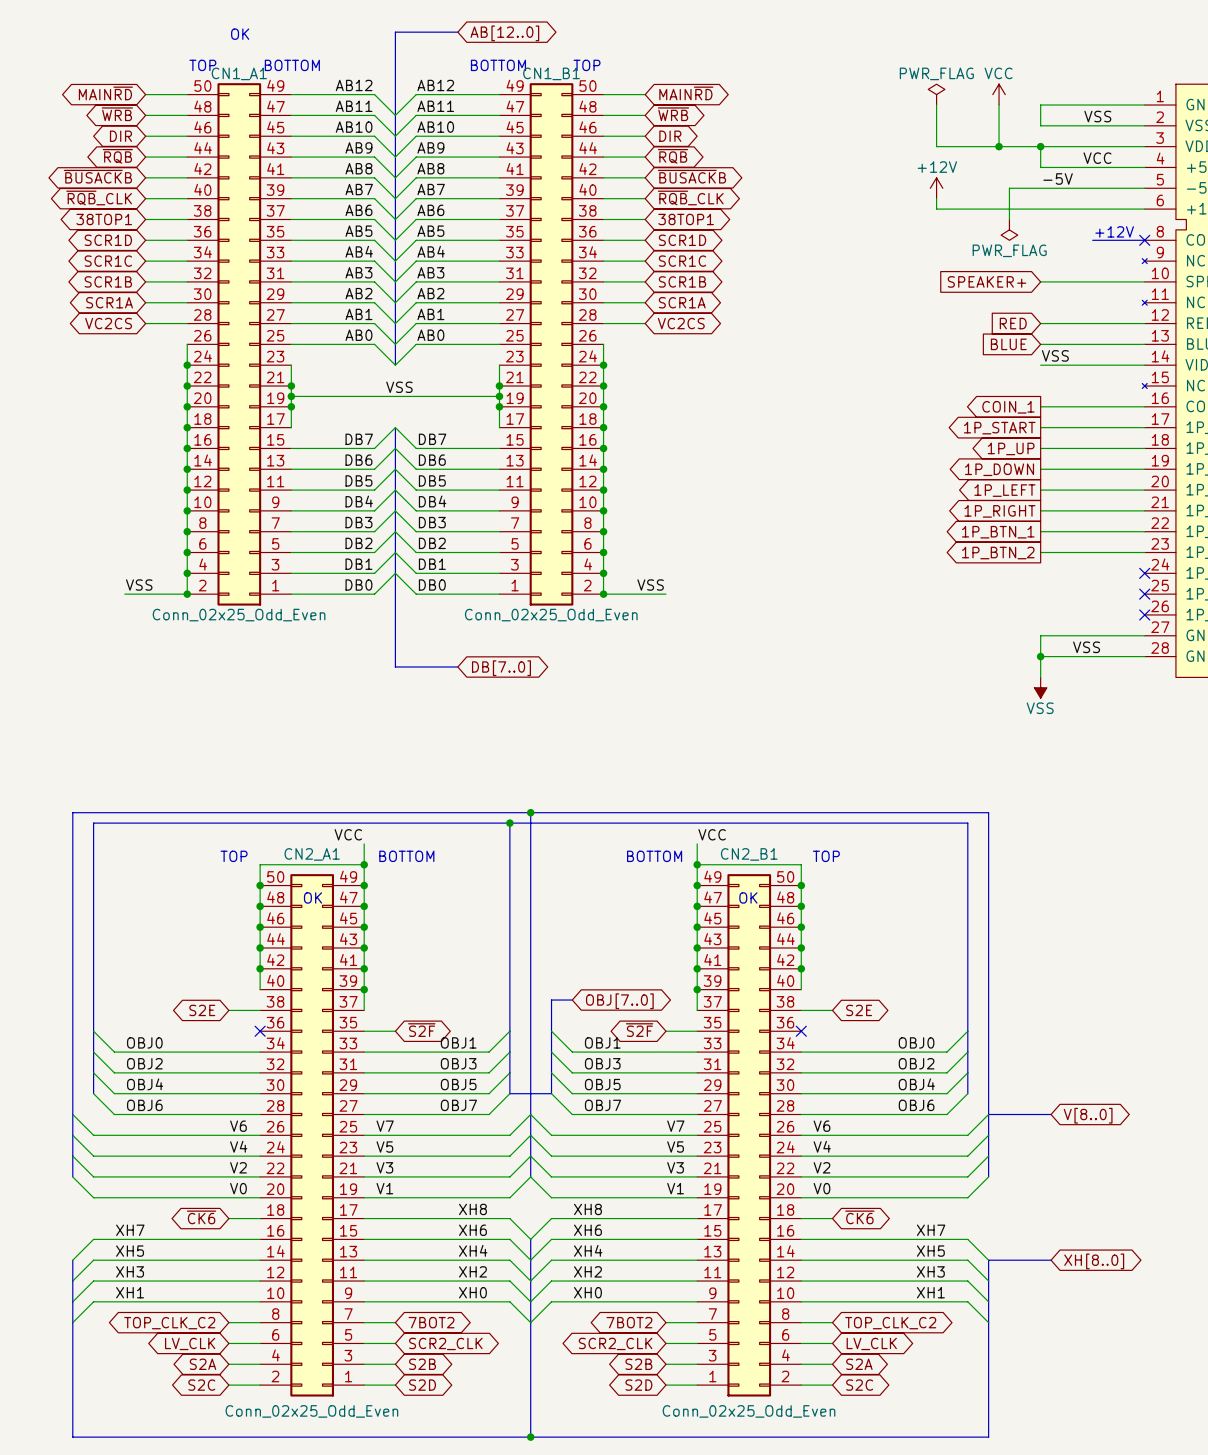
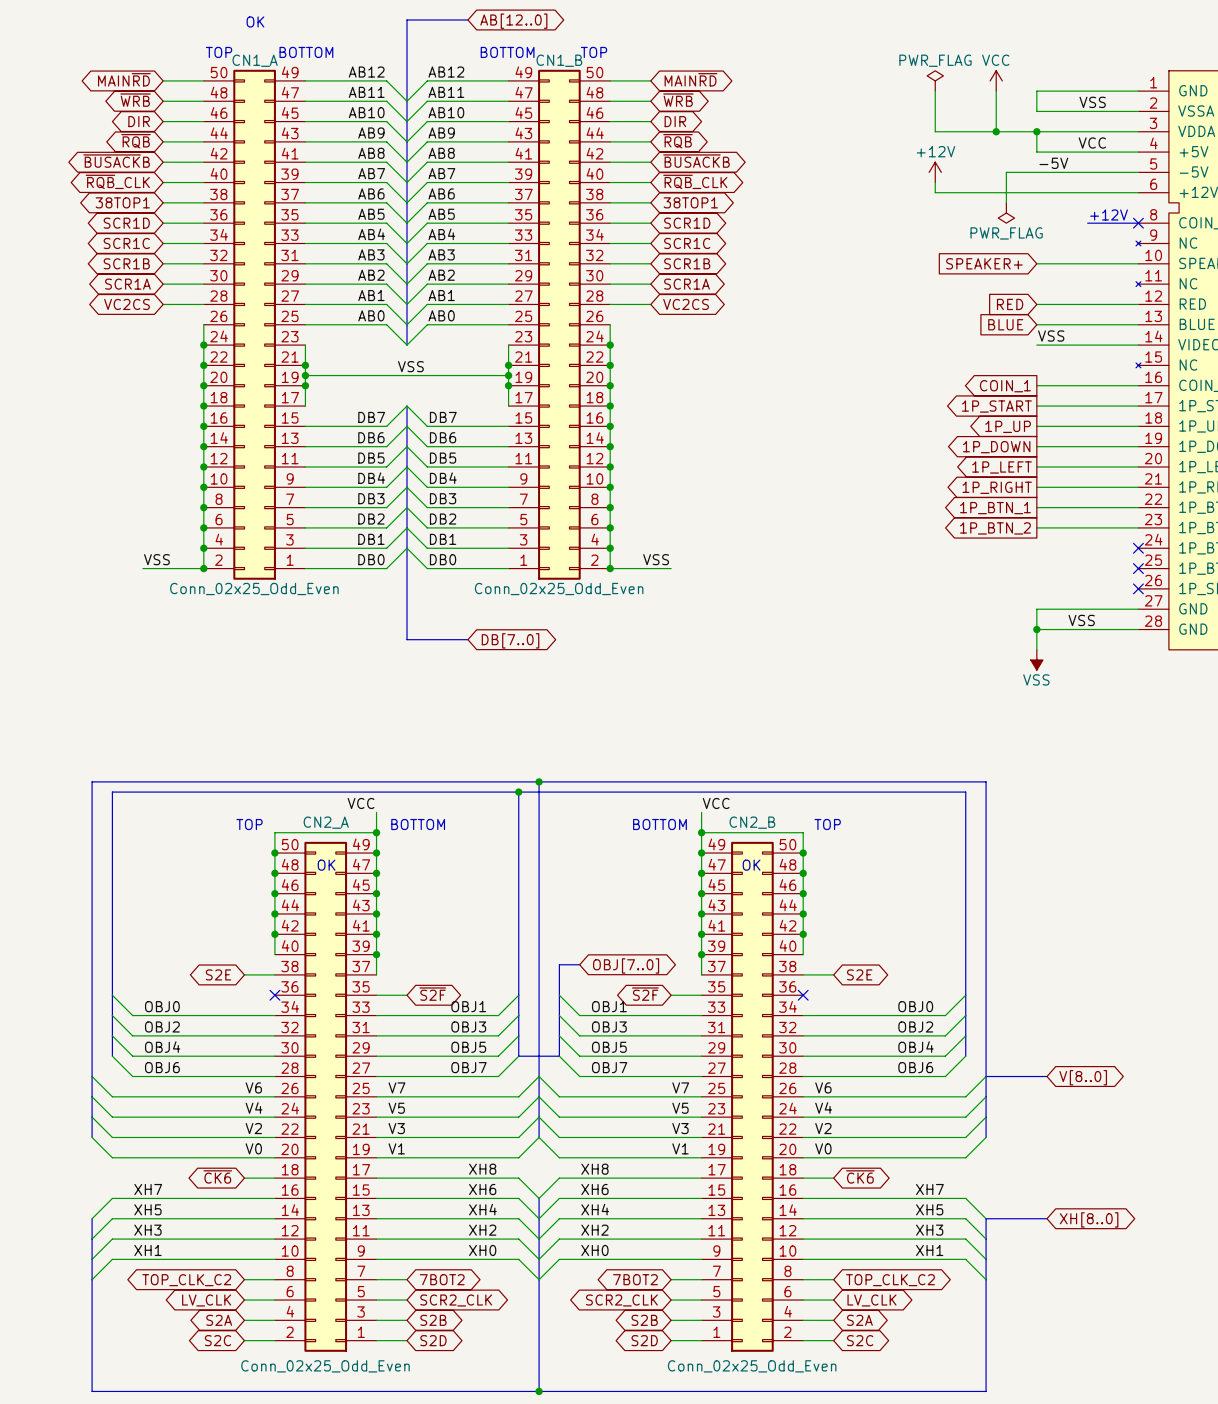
CN1_A1 name: CN1_A1 (239, 73) -> CN1_A (255, 60)
CN1_B1 name: CN1_B1 (551, 73) -> CN1_B (559, 60)
CN2_A1 name: CN2_A1 (312, 854) -> CN2_A (326, 822)
CN2_B1 name: CN2_B1 (749, 854) -> CN2_B (752, 822)

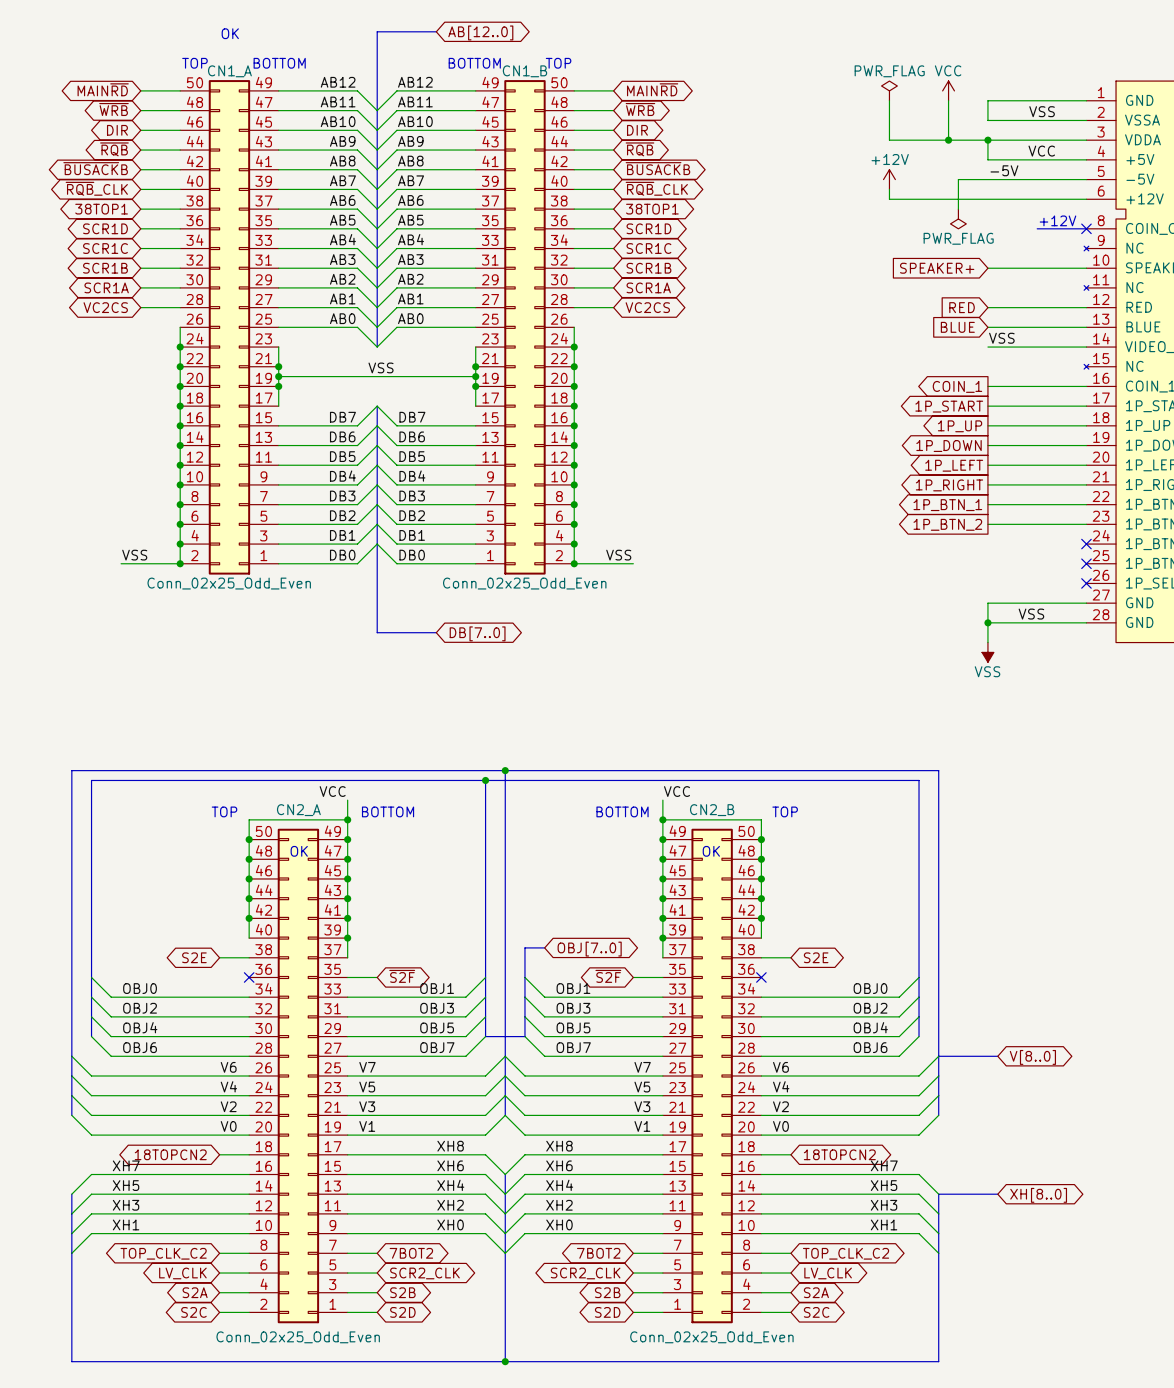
global label: ~{CK6} (217, 1176) -> 18TOPCN2 (170, 1154)
global label: ~{CK6} (860, 1176) -> 18TOPCN2 (839, 1154)

